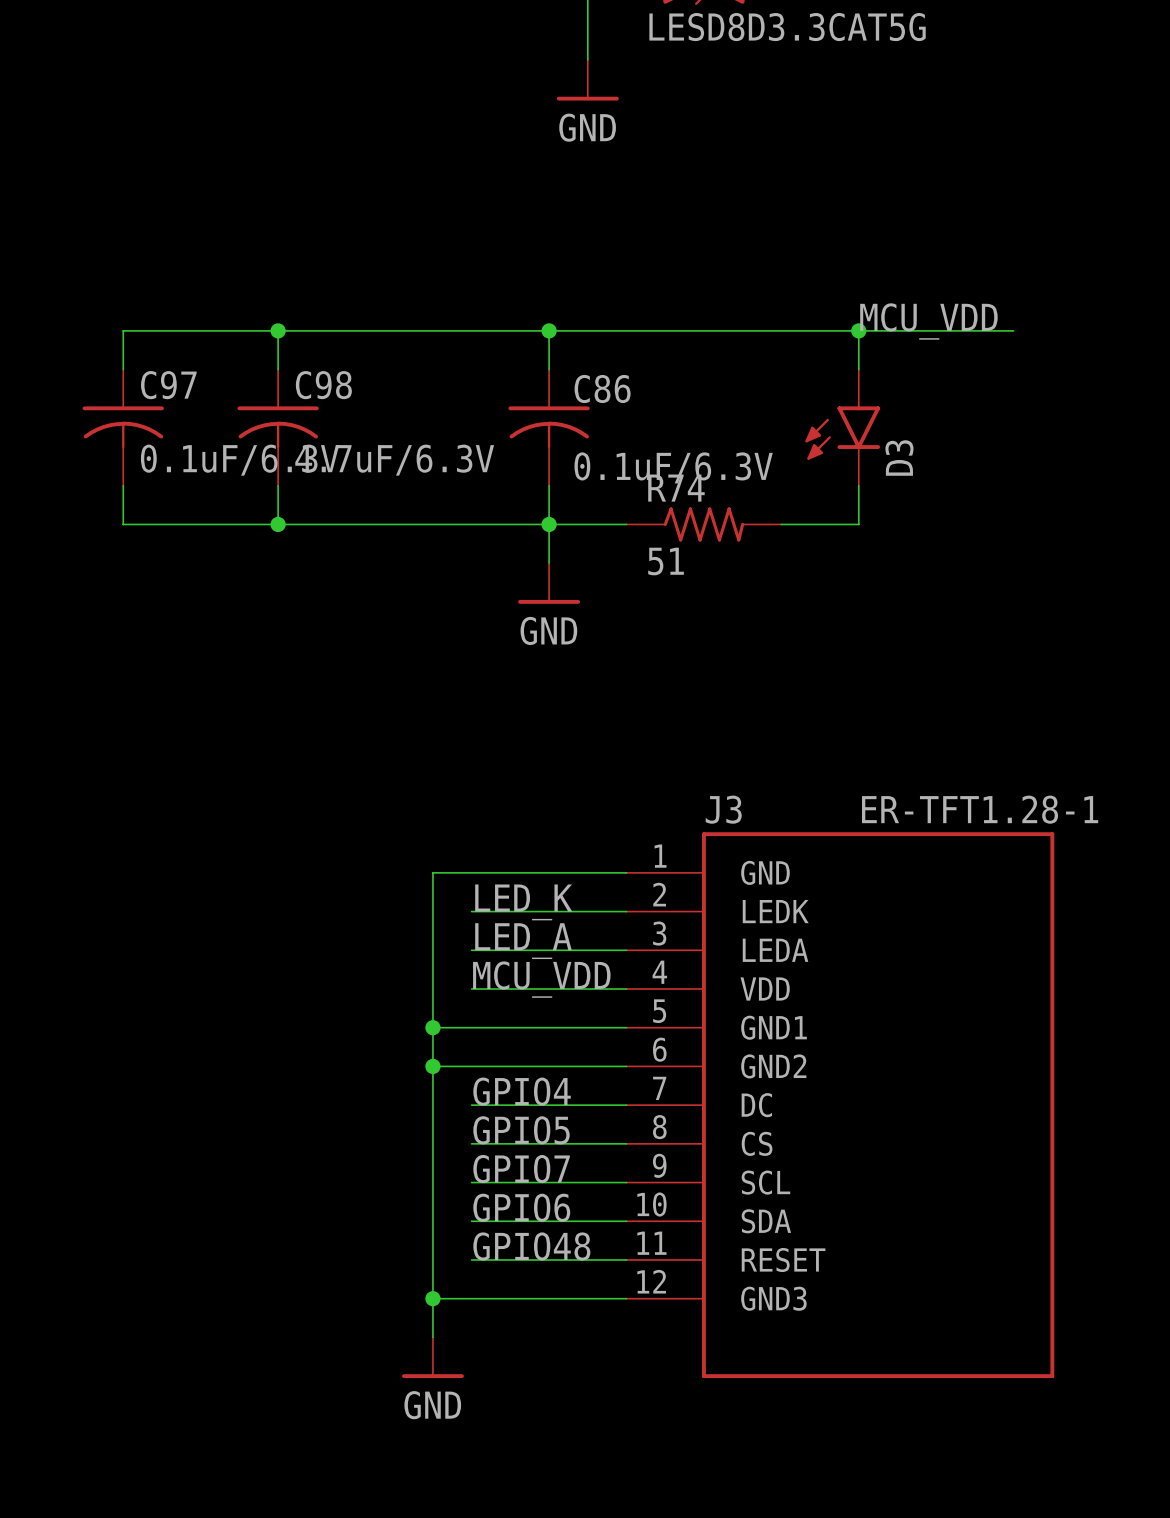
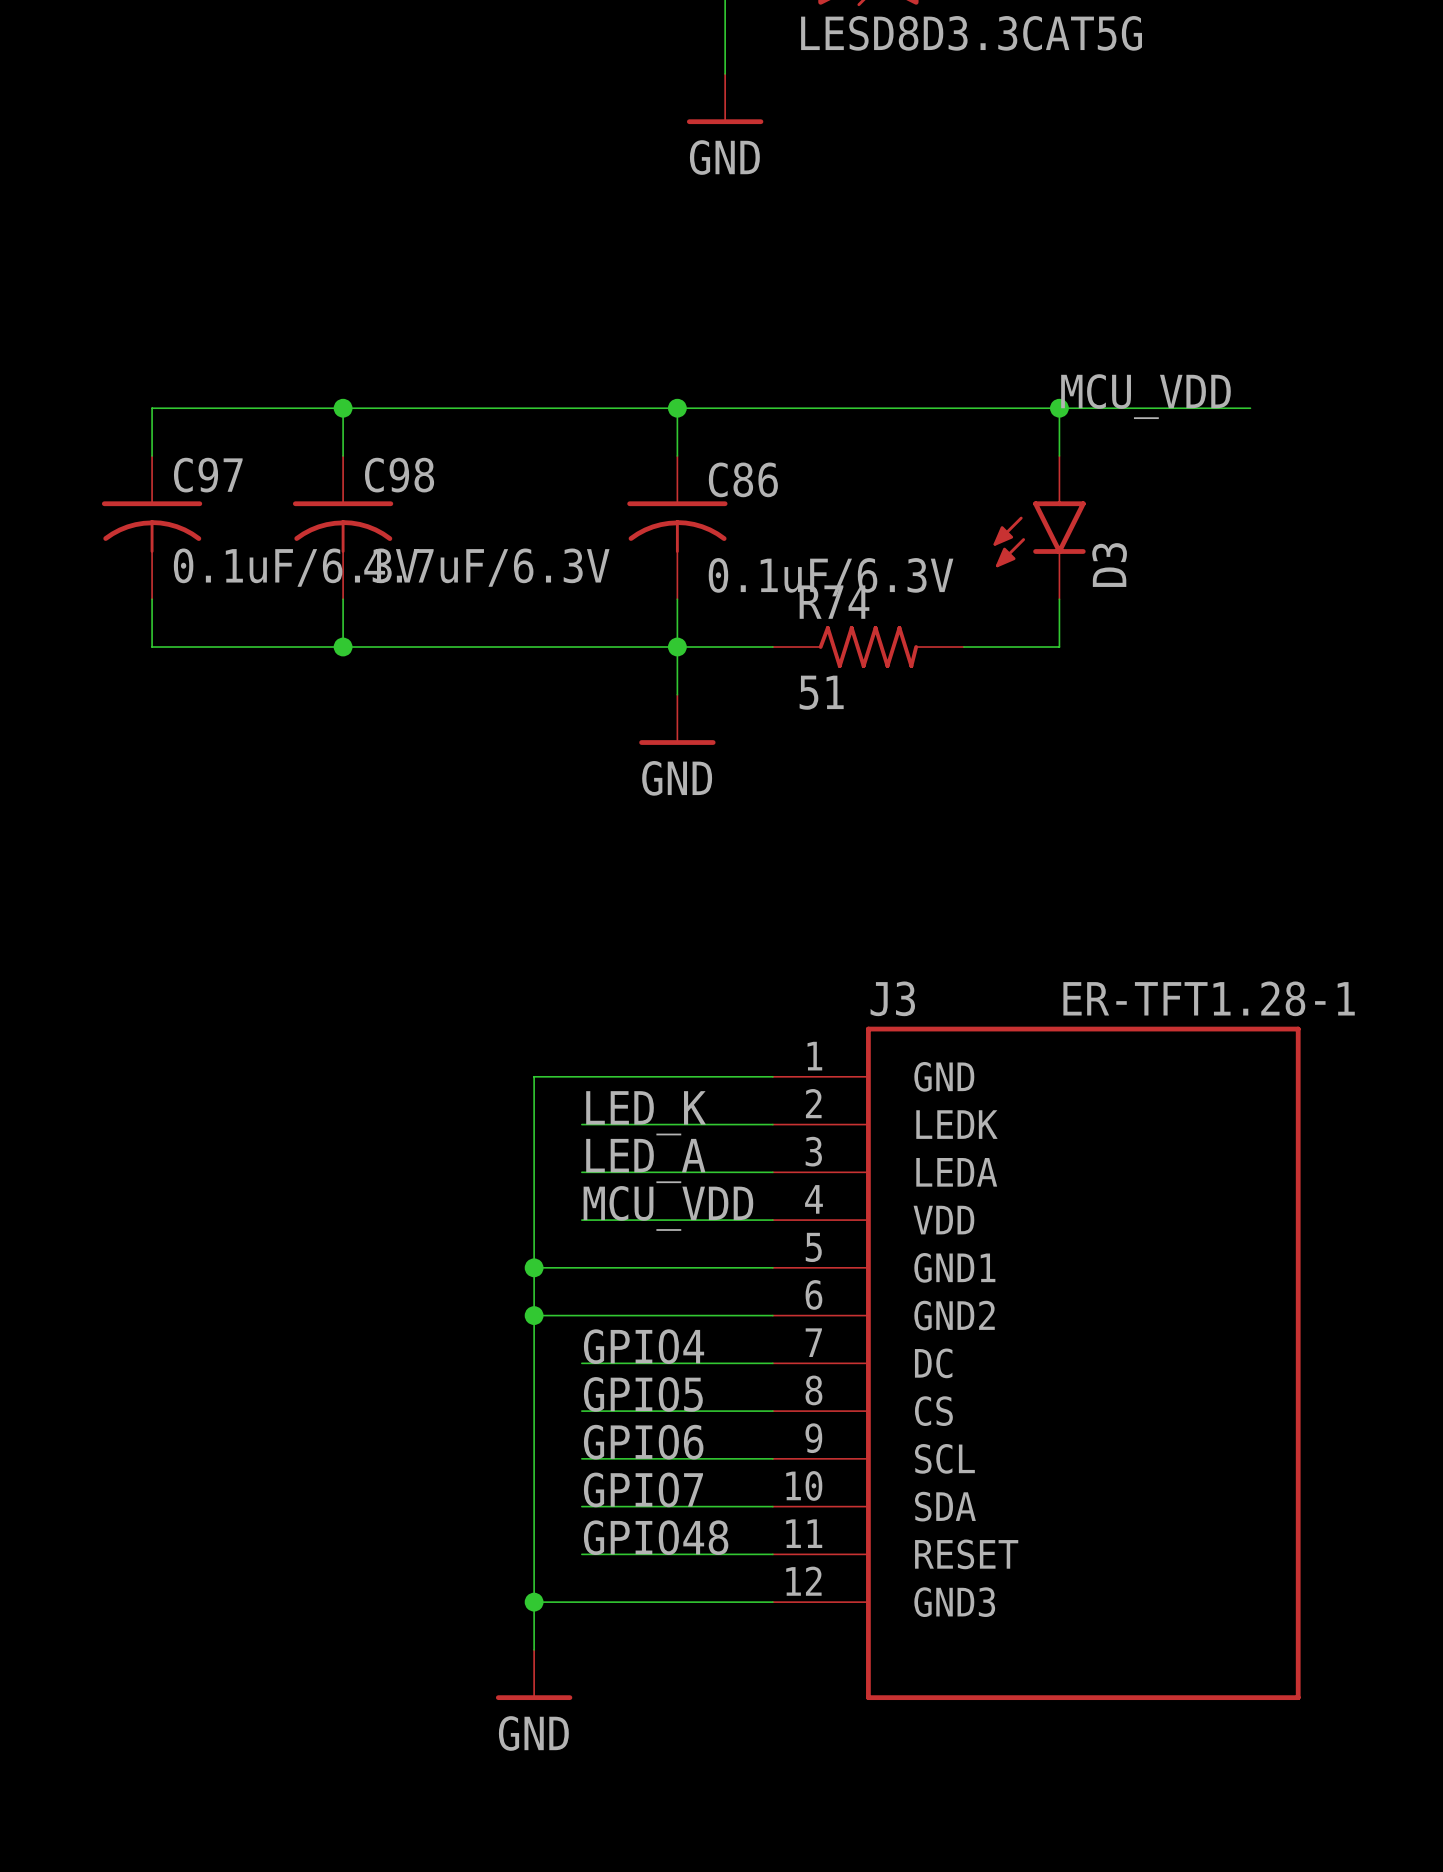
label: GPIO7 (521, 1169) -> GPIO6 (643, 1442)
label: GPIO6 (521, 1207) -> GPIO7 (643, 1489)

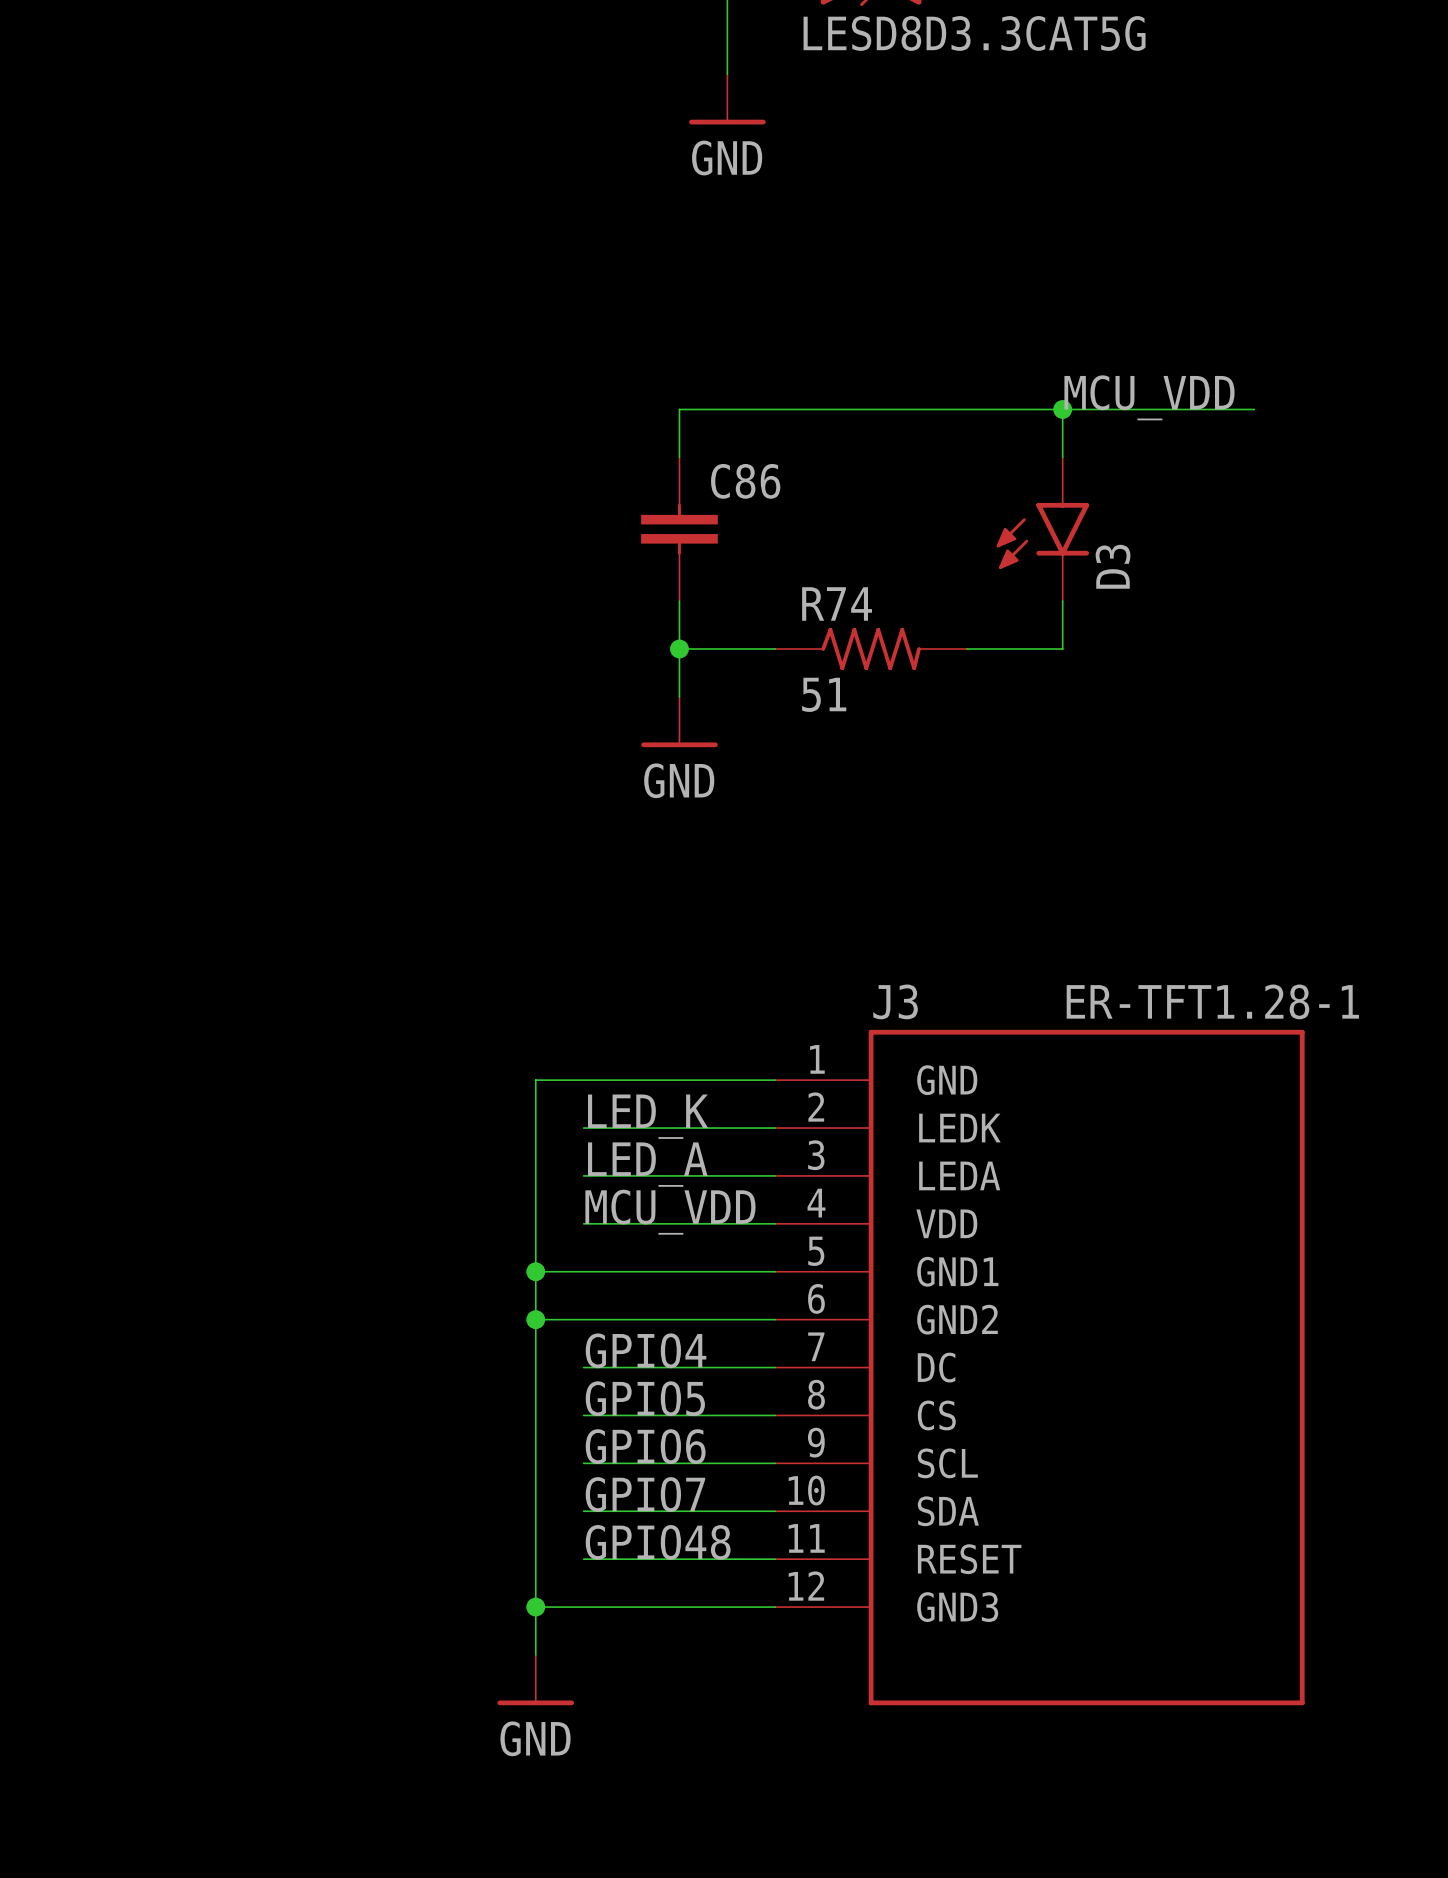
wire: (343, 408) (343, 455) -> none
junction: (343, 408) -> none
wire: (677, 408) (152, 408) (152, 455) -> none
junction: (677, 408) -> none
C86 symbol: [627, 455, 728, 600] -> [641, 457, 718, 602]
C97: 0.1uF/6.3V (152, 527) -> none
C98: 4.7uF/6.3V (343, 527) -> none
C86 value: 0.1uF/6.3V (831, 577) -> none
wire: (152, 599) (152, 647) (677, 647) -> none
wire: (343, 599) (343, 647) -> none
junction: (343, 647) -> none

